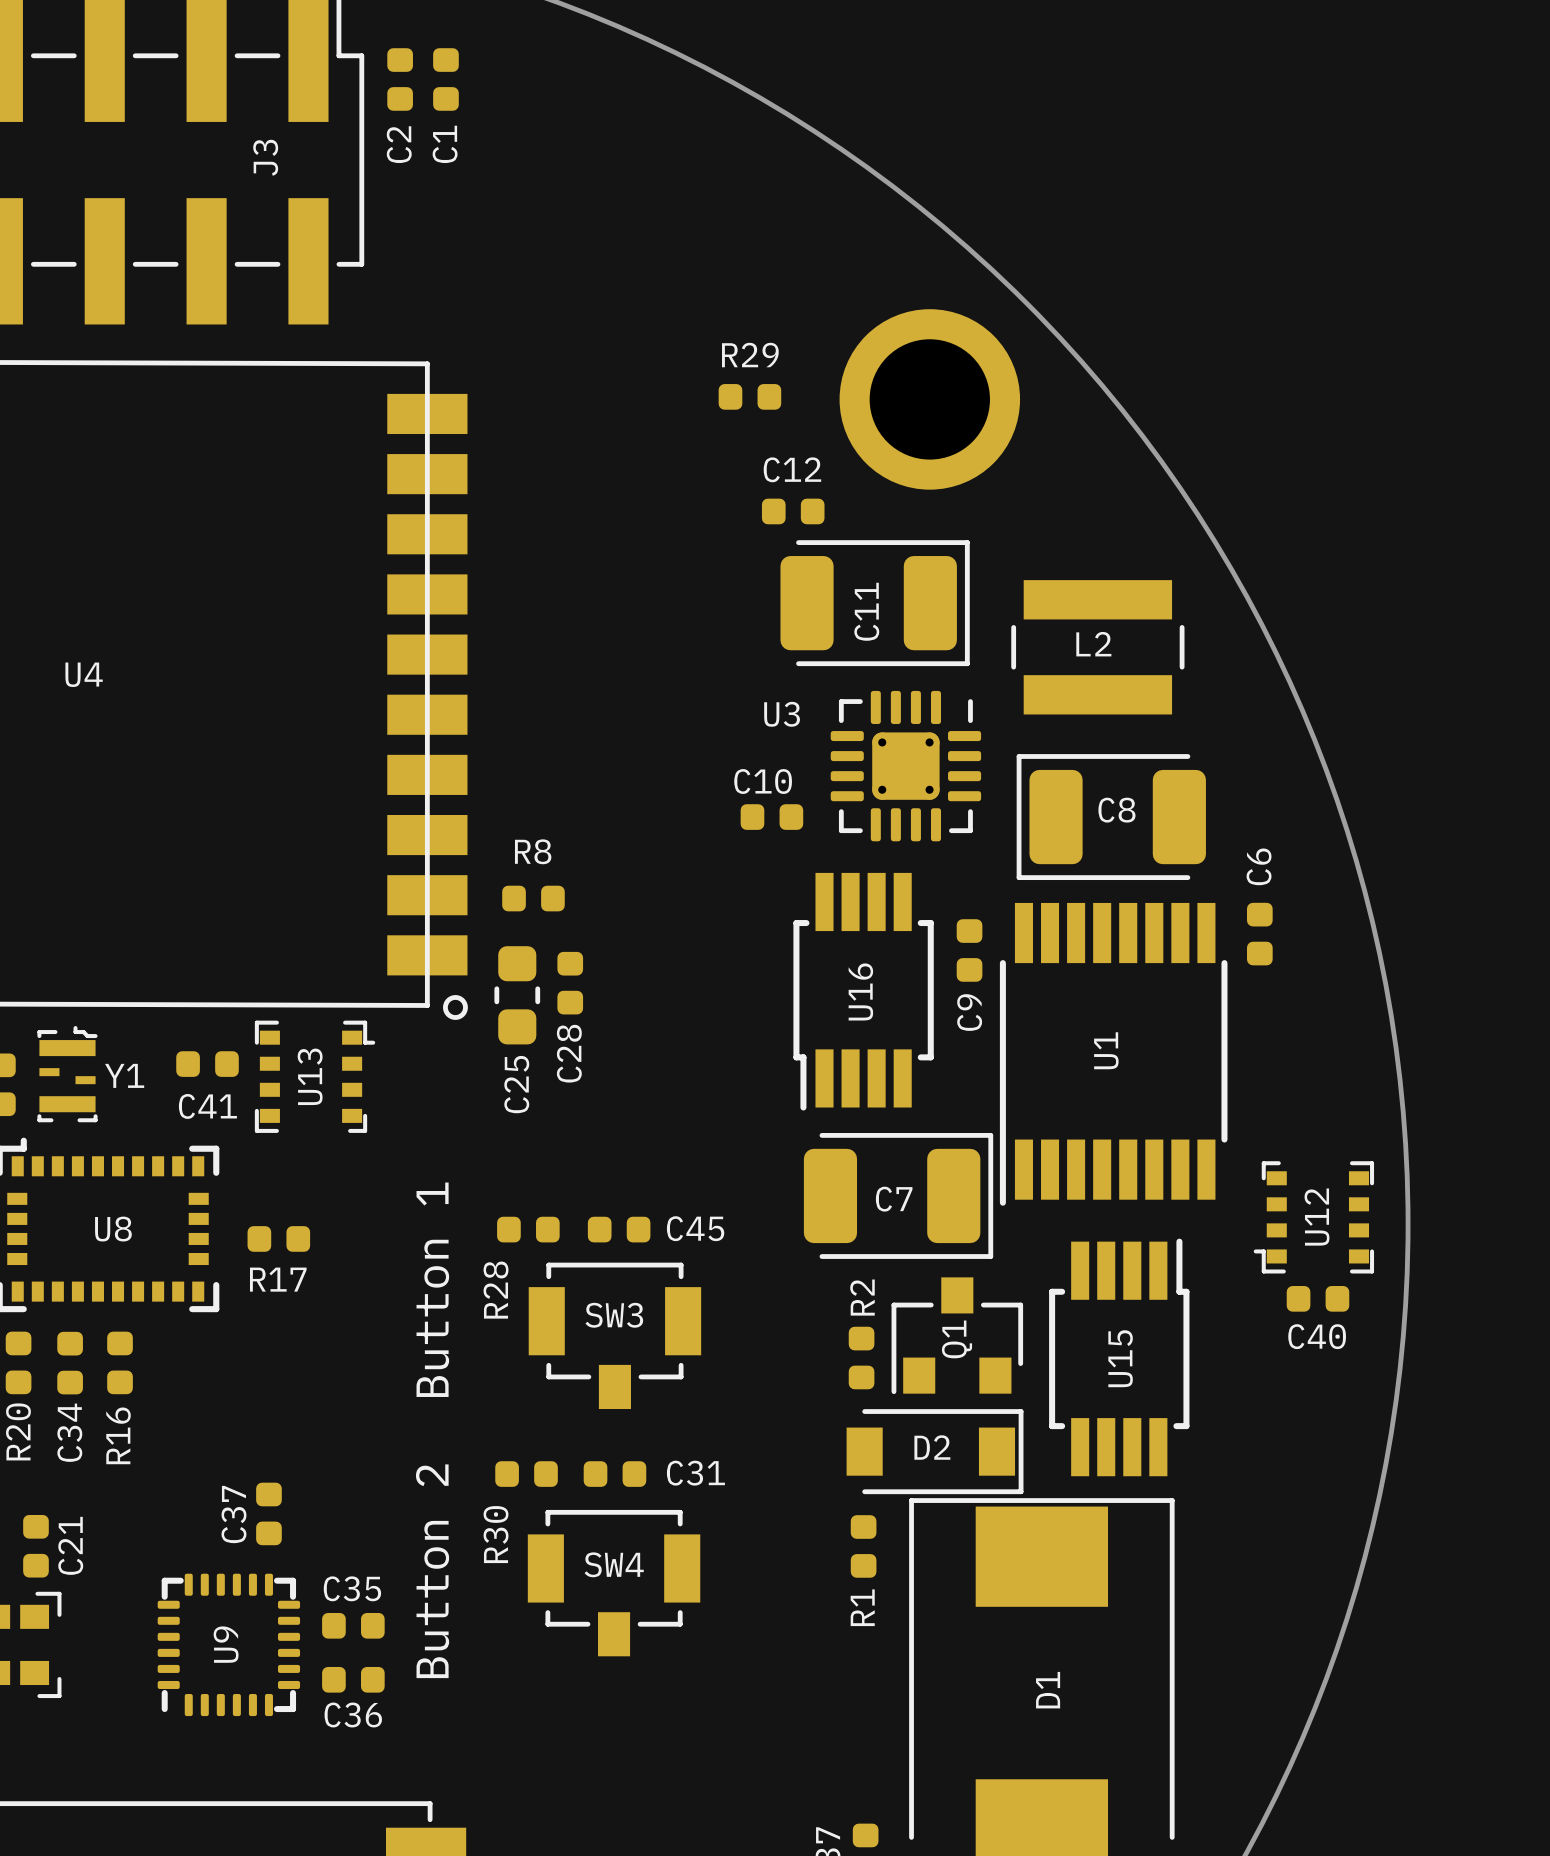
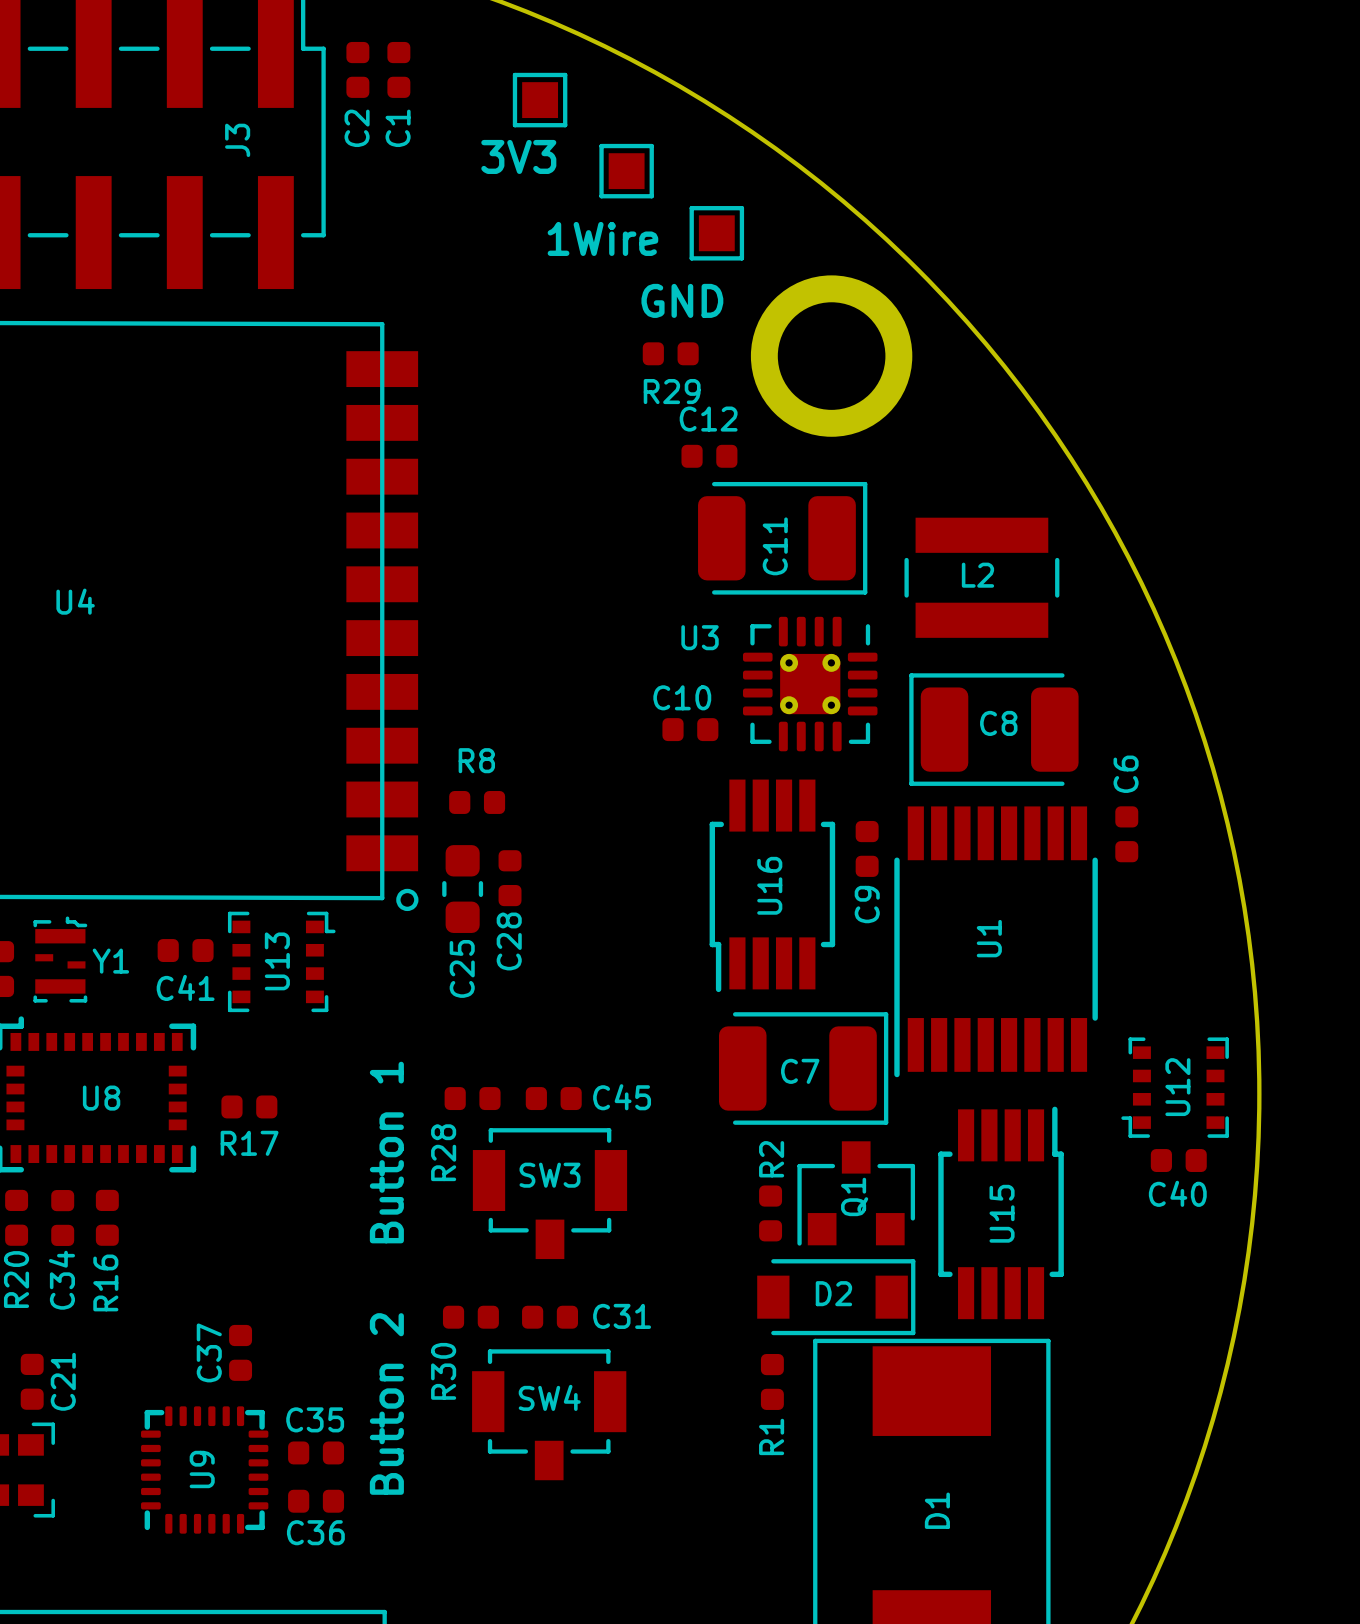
part: none -> (540, 100)
text: none -> 3V3 (518, 156)
part: none -> (626, 171)
part: none -> (716, 233)
text: none -> 1Wire (602, 238)
text: none -> GND (682, 300)
R29 name position: R29 (750, 355) -> R29 (672, 391)

